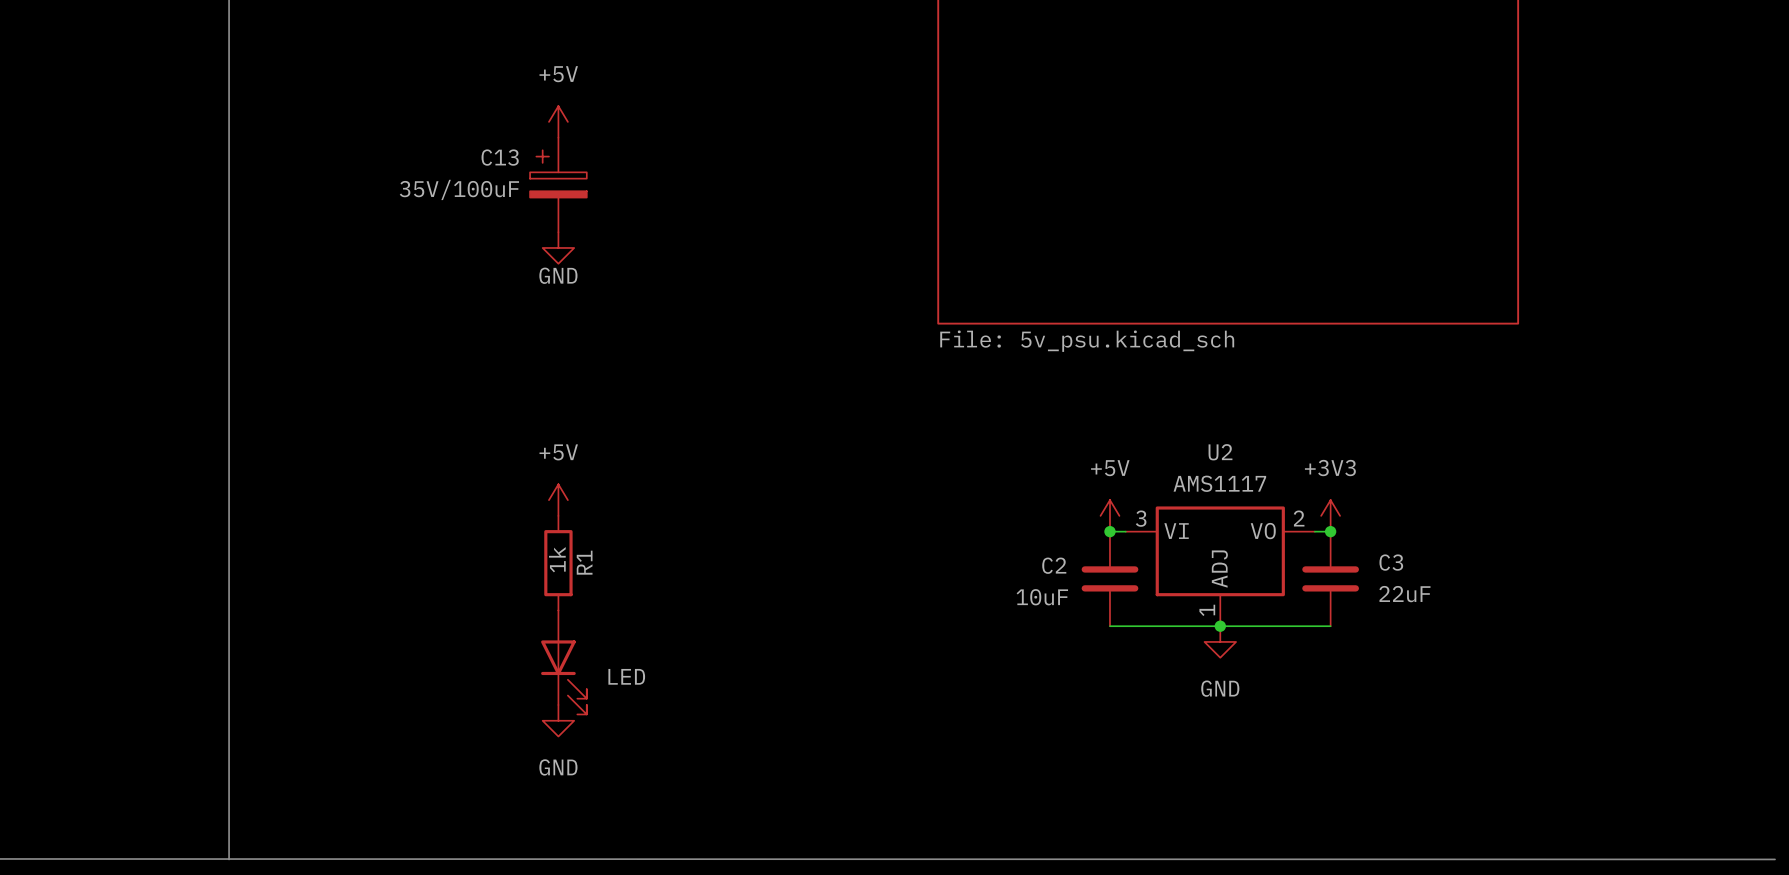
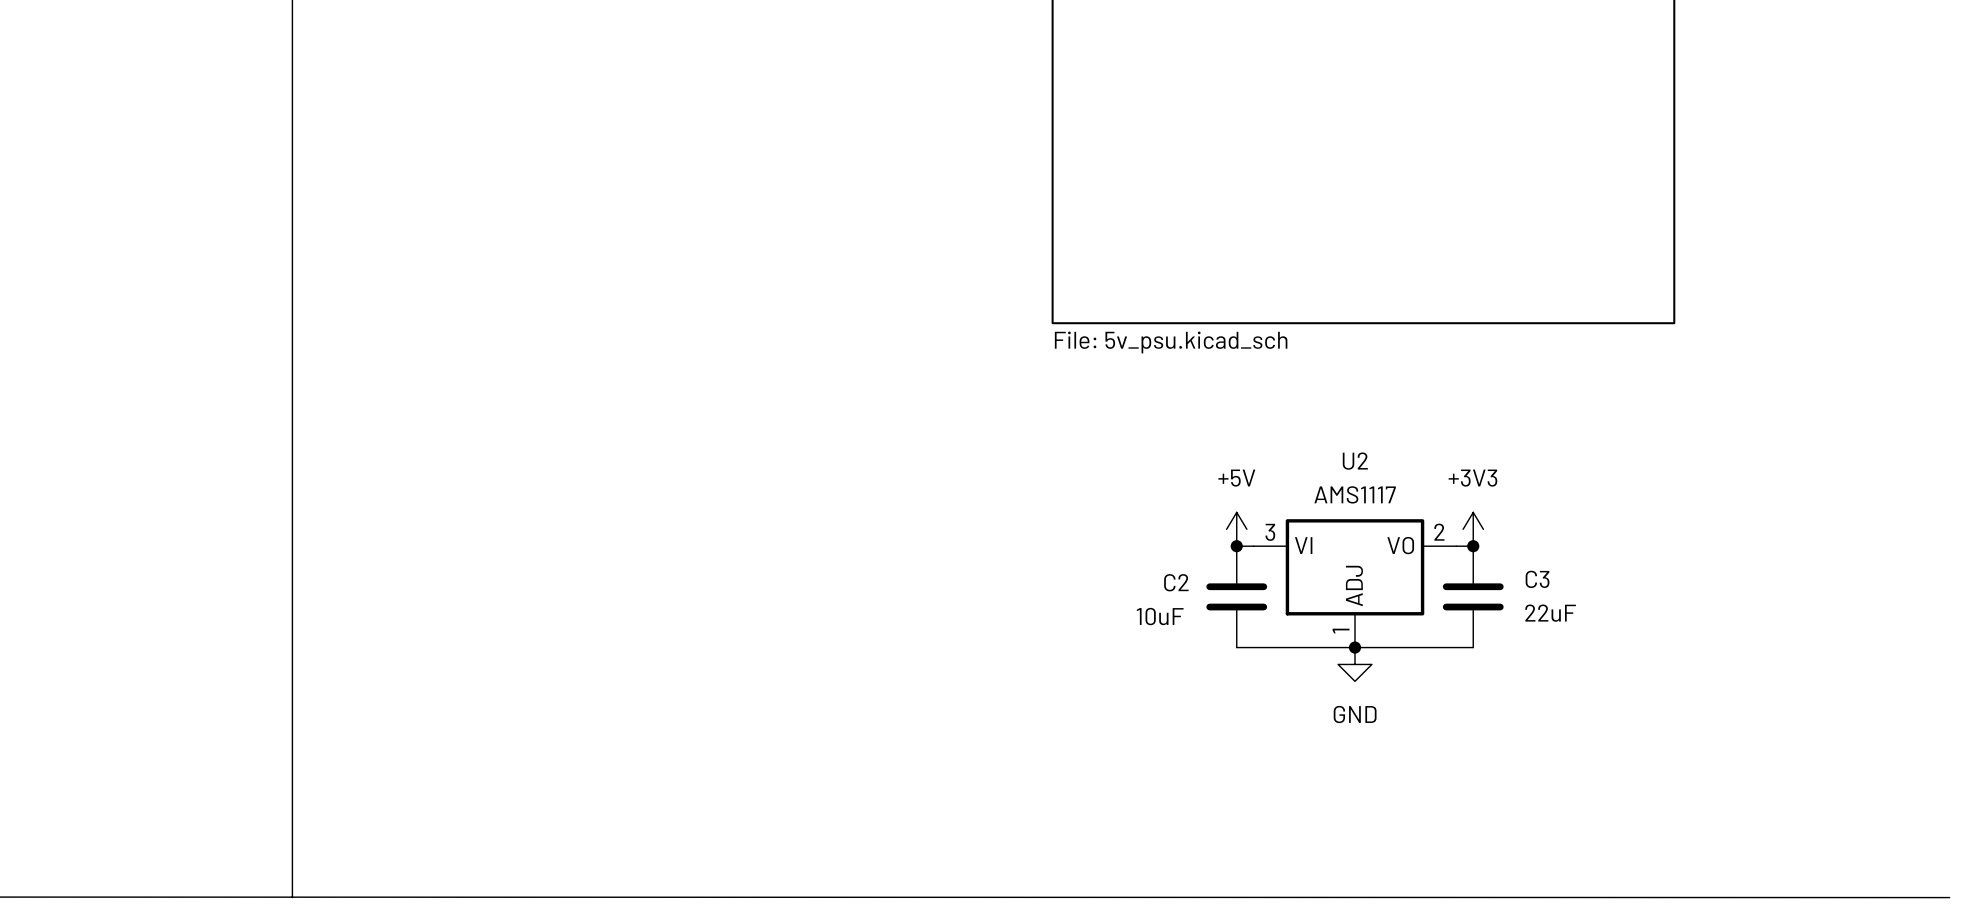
power symbol: +5V (558, 121) -> none
C13: 35V/100uF (558, 184) -> none
power symbol: GND (558, 247) -> none
power symbol: +5V (558, 500) -> none
R1: 1k (558, 563) -> none
part: LED (563, 662) -> none
power symbol: GND (558, 720) -> none

